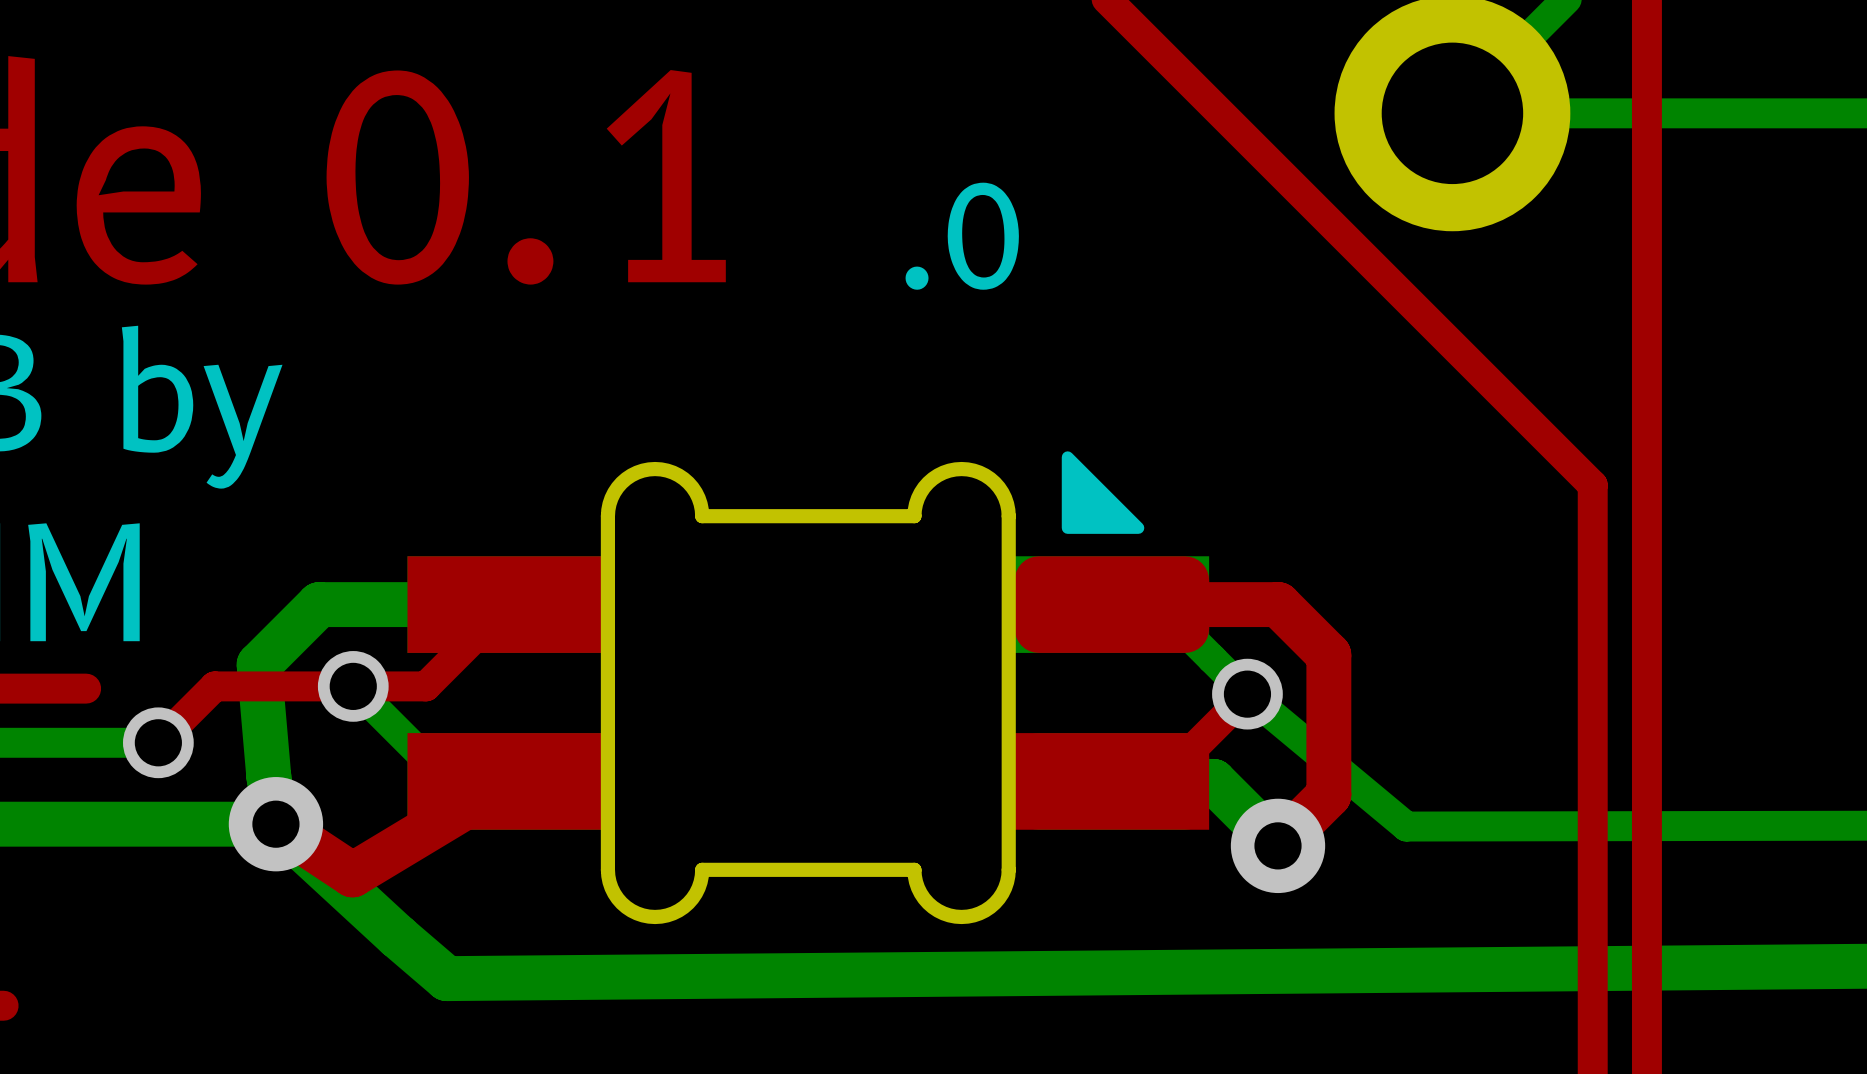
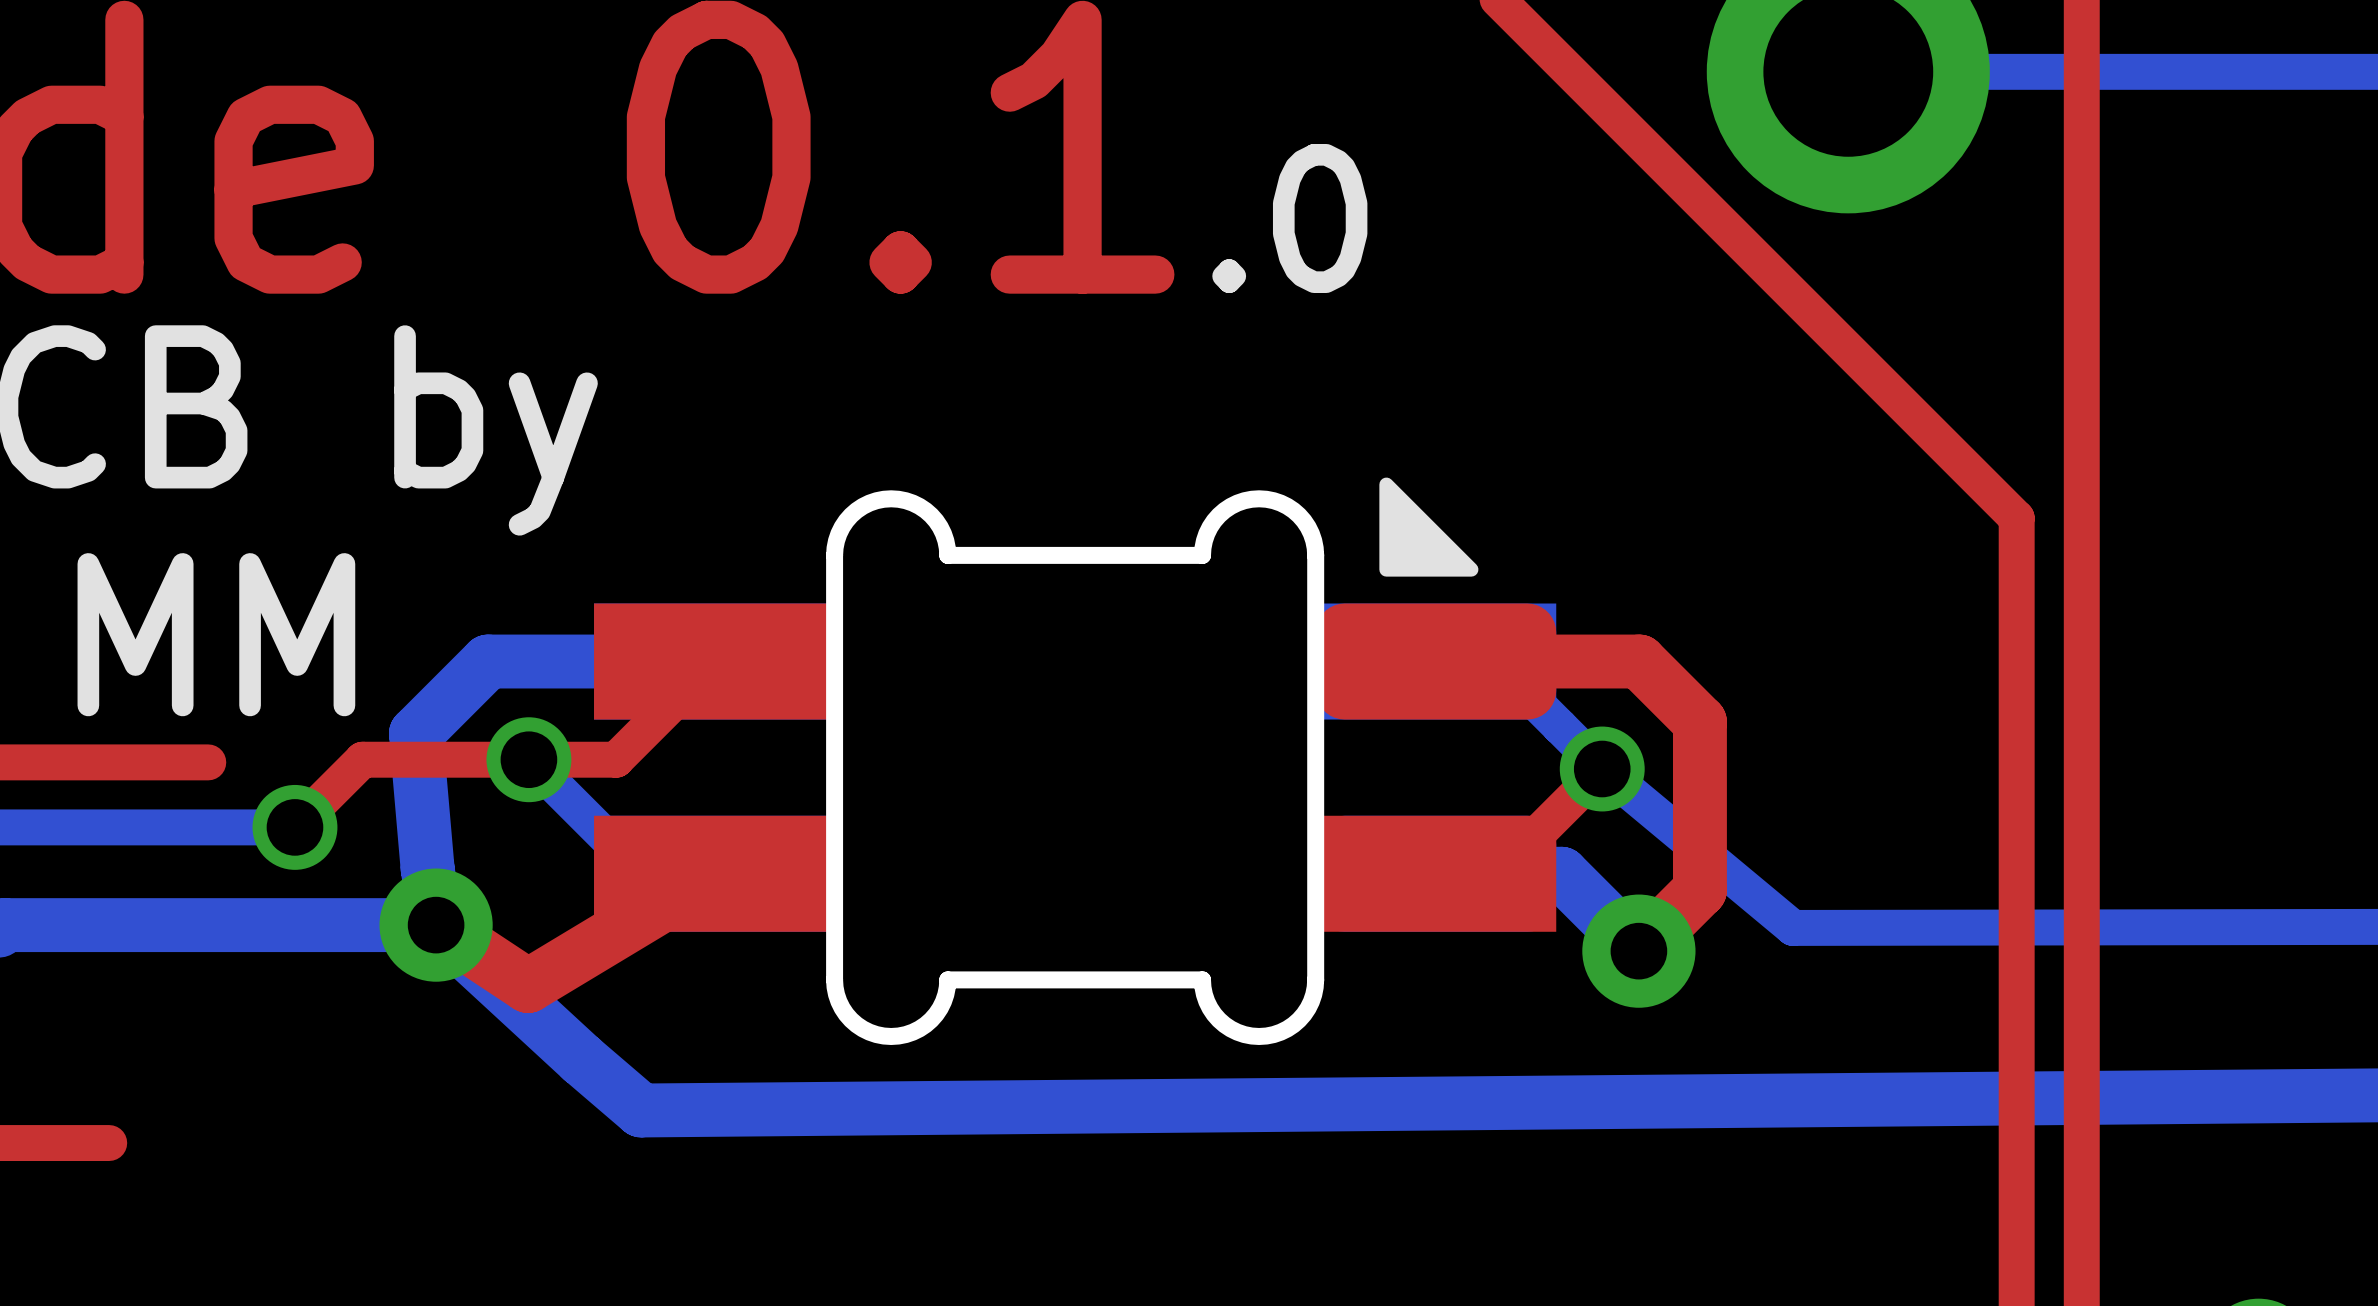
part footprint: [407, 451, 1210, 925] -> [594, 477, 1557, 1045]

